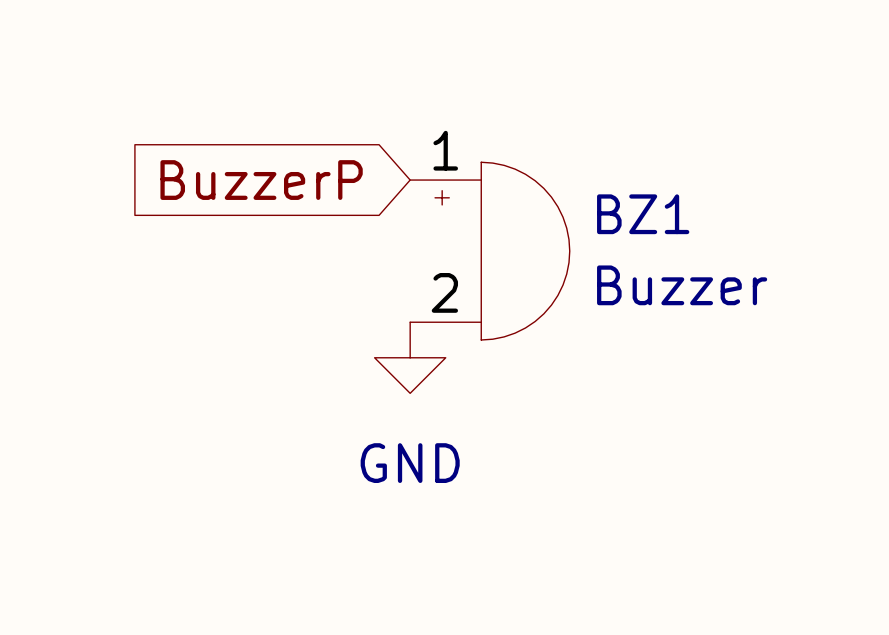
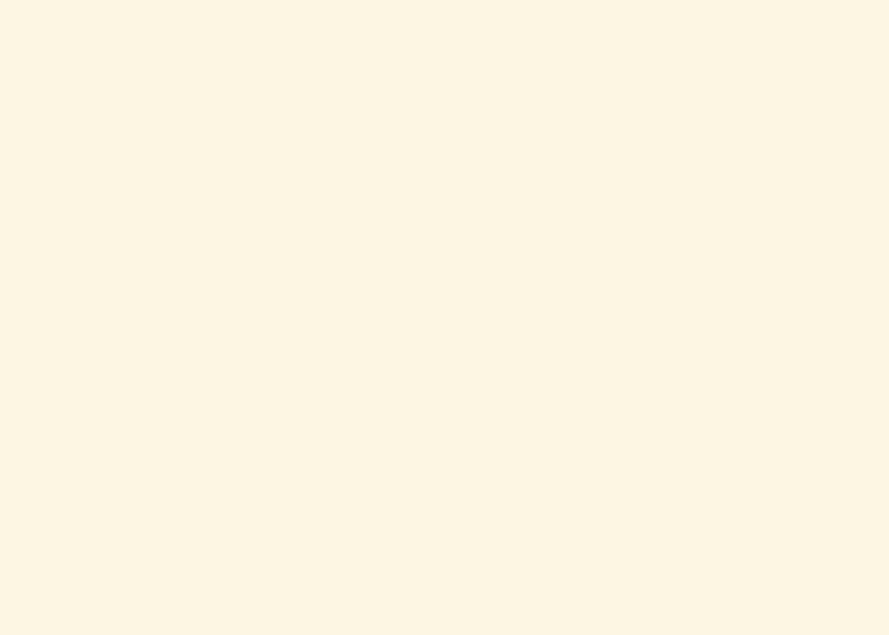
global label: BuzzerP (261, 180) -> none
BZ1: Buzzer (489, 251) -> none
power symbol: GND (410, 357) -> none

